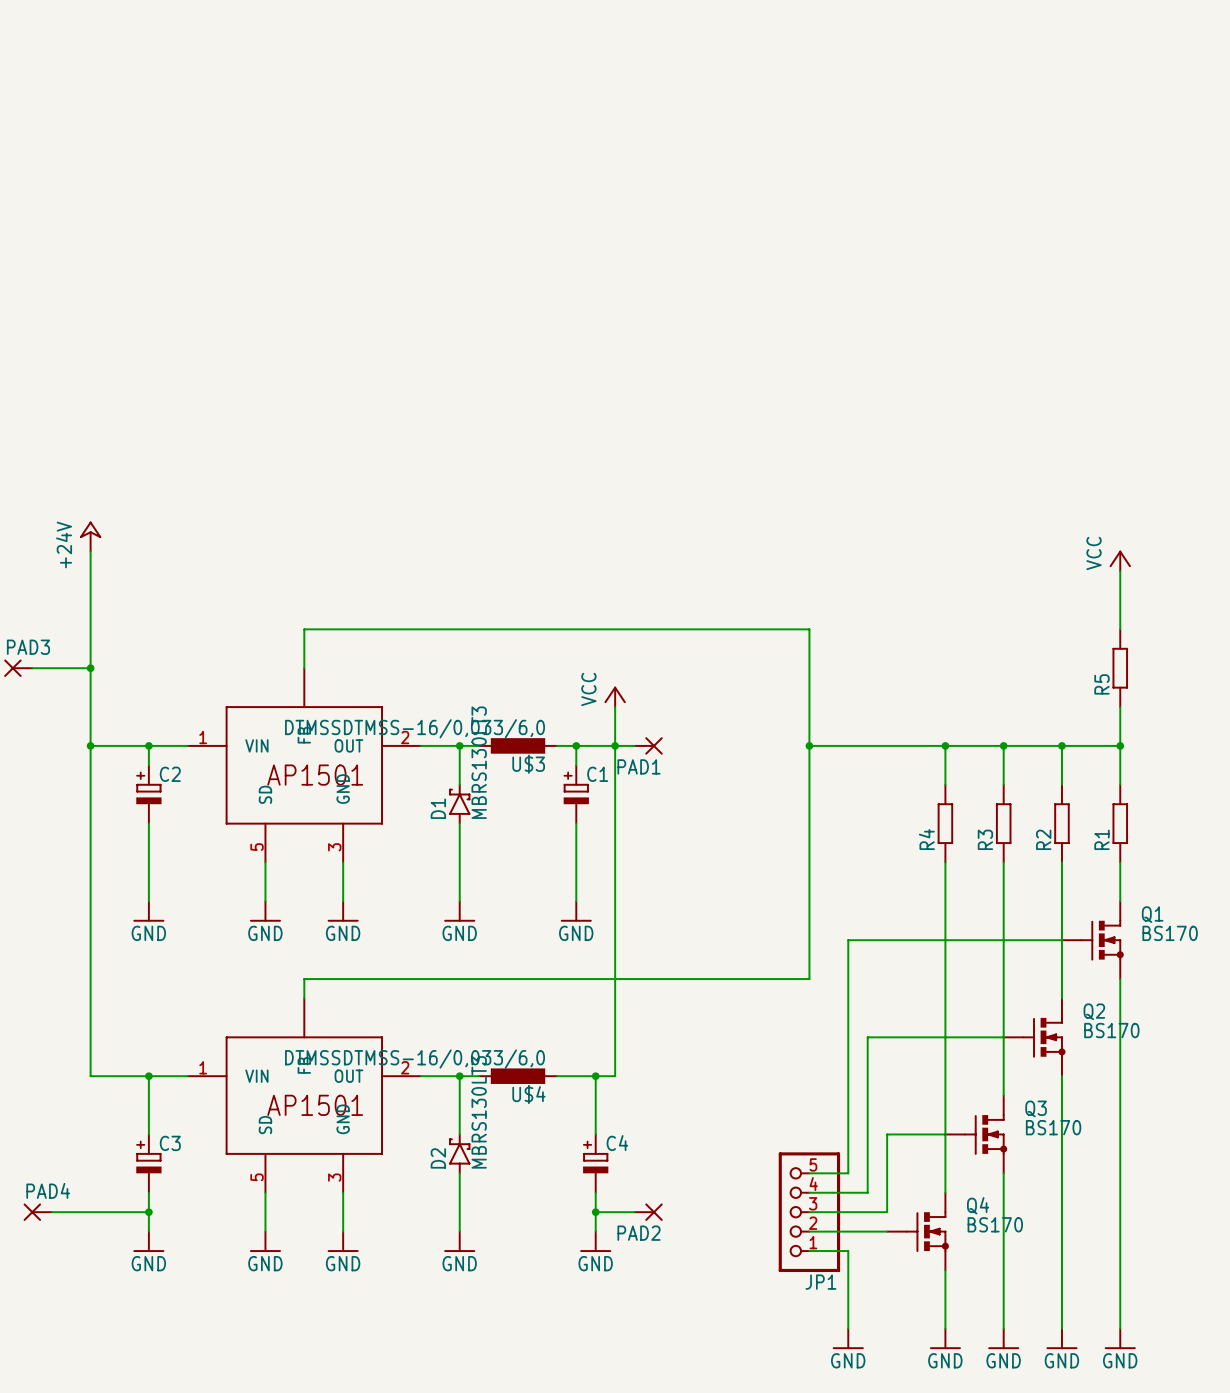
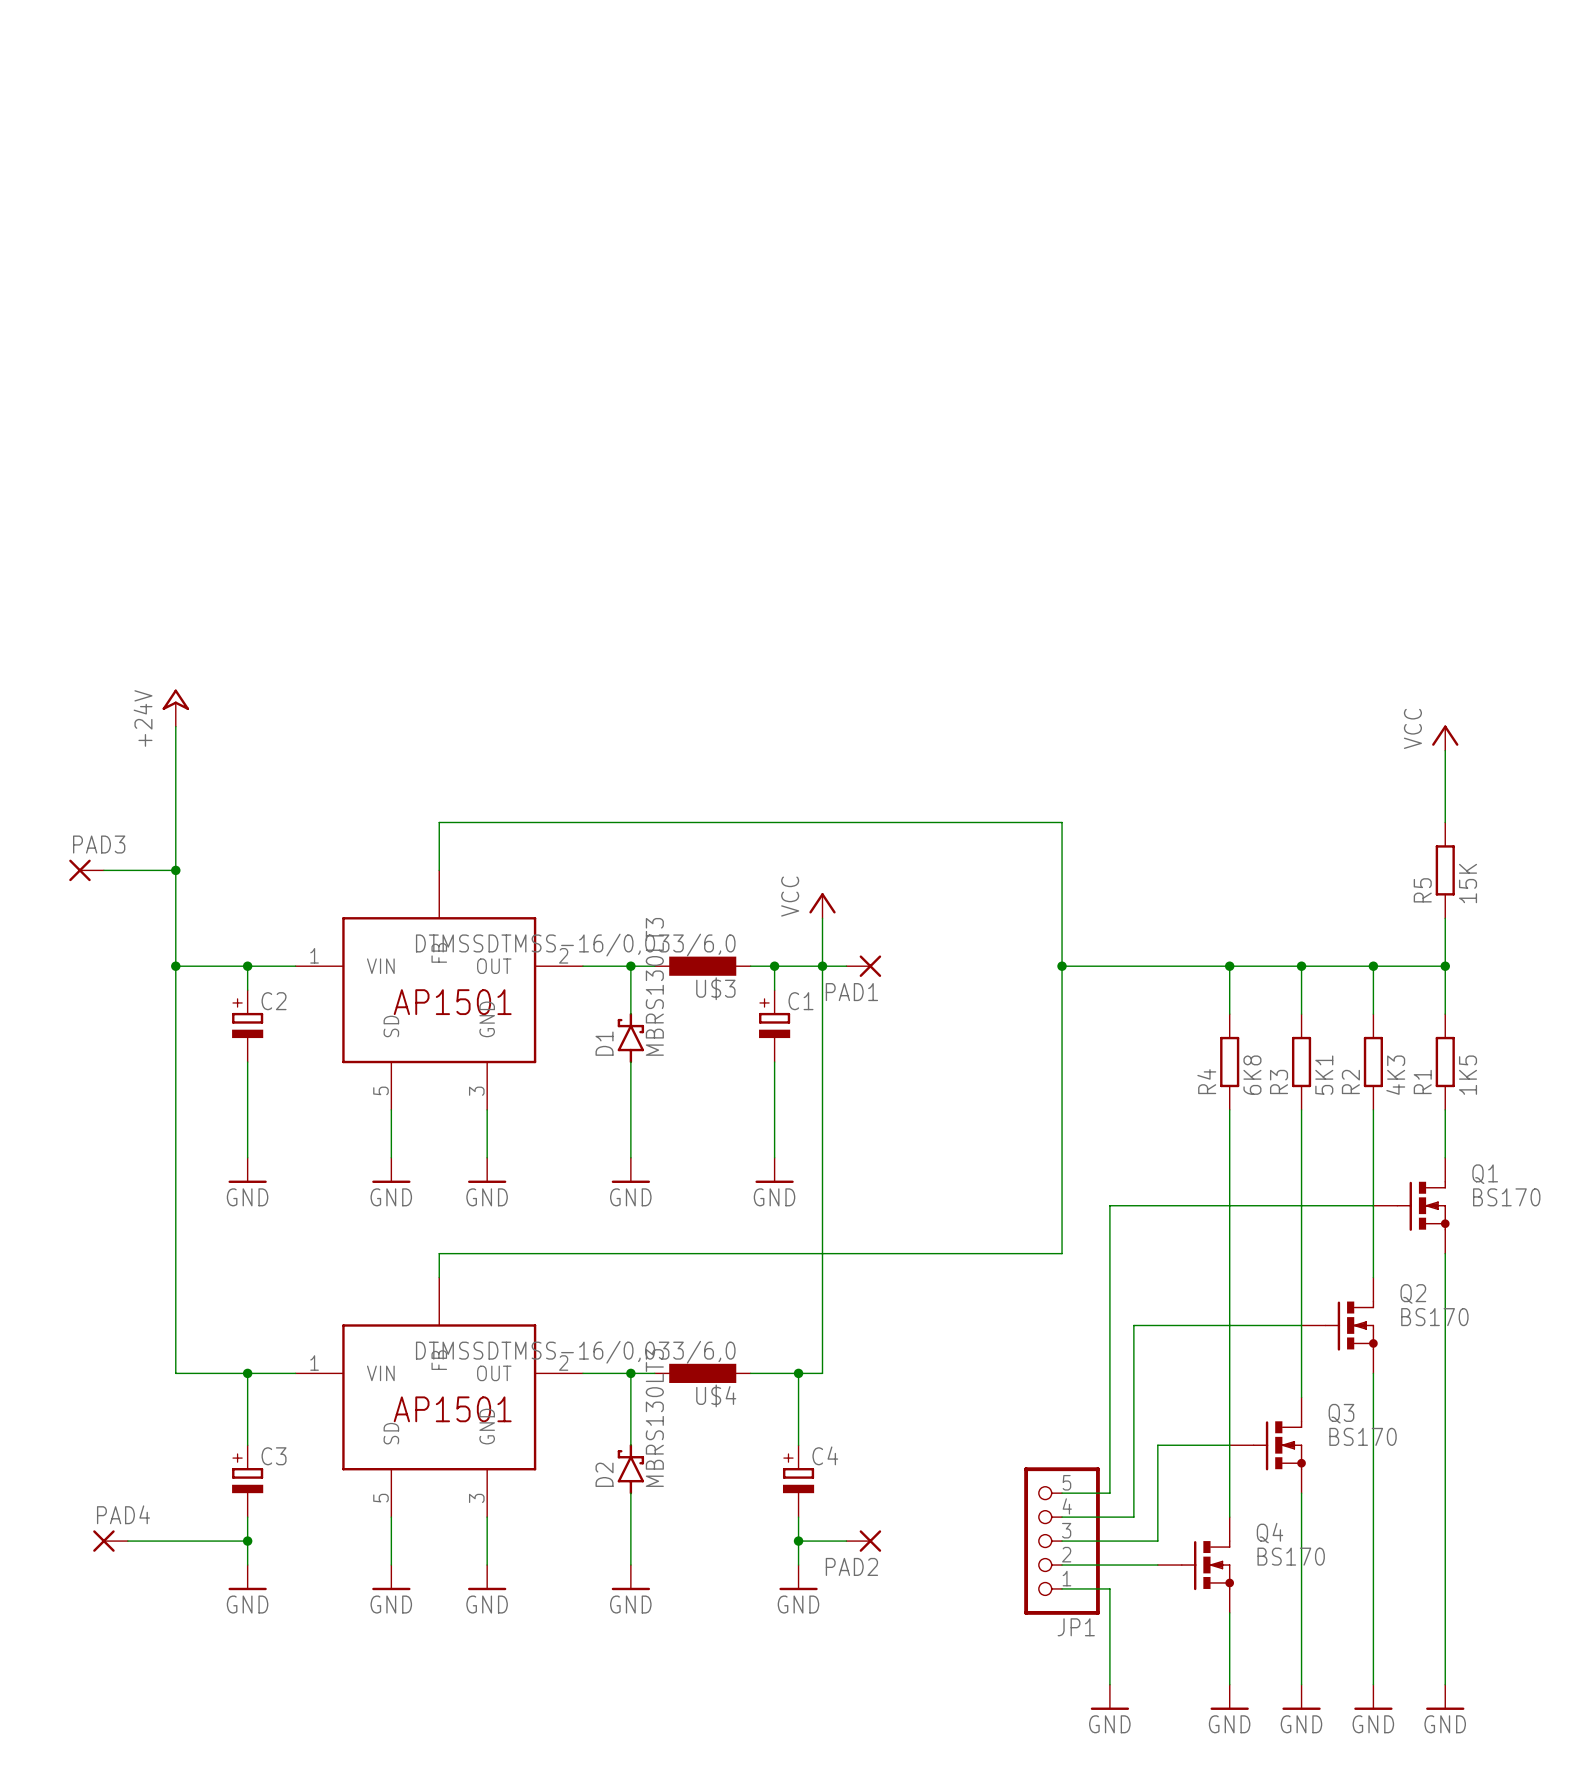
R5 value: none -> 15K (1468, 883)
R4 value: none -> 6K8 (1252, 1075)
R3 value: none -> 5K1 (1324, 1075)
R2 value: none -> 4K3 (1395, 1075)
R1 value: none -> 1K5 (1468, 1075)

